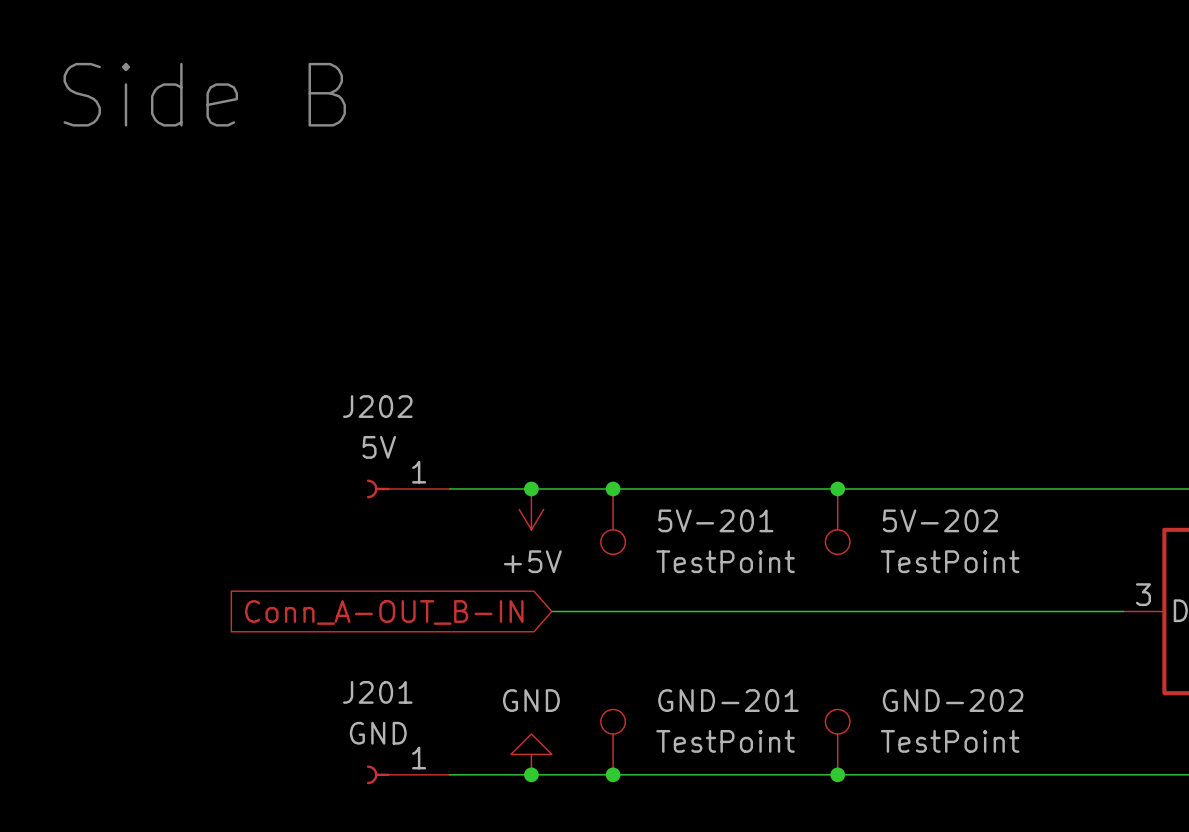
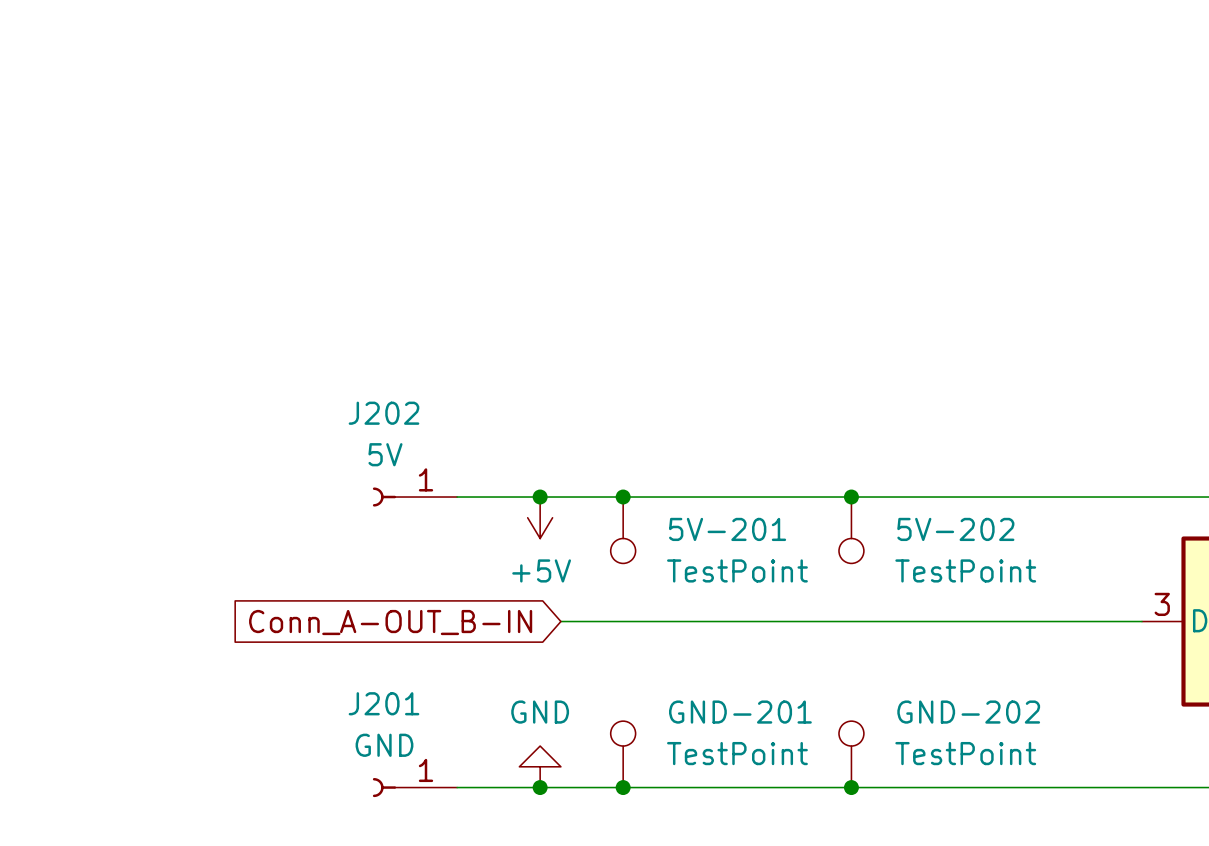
text: Side B (204, 94) -> none

